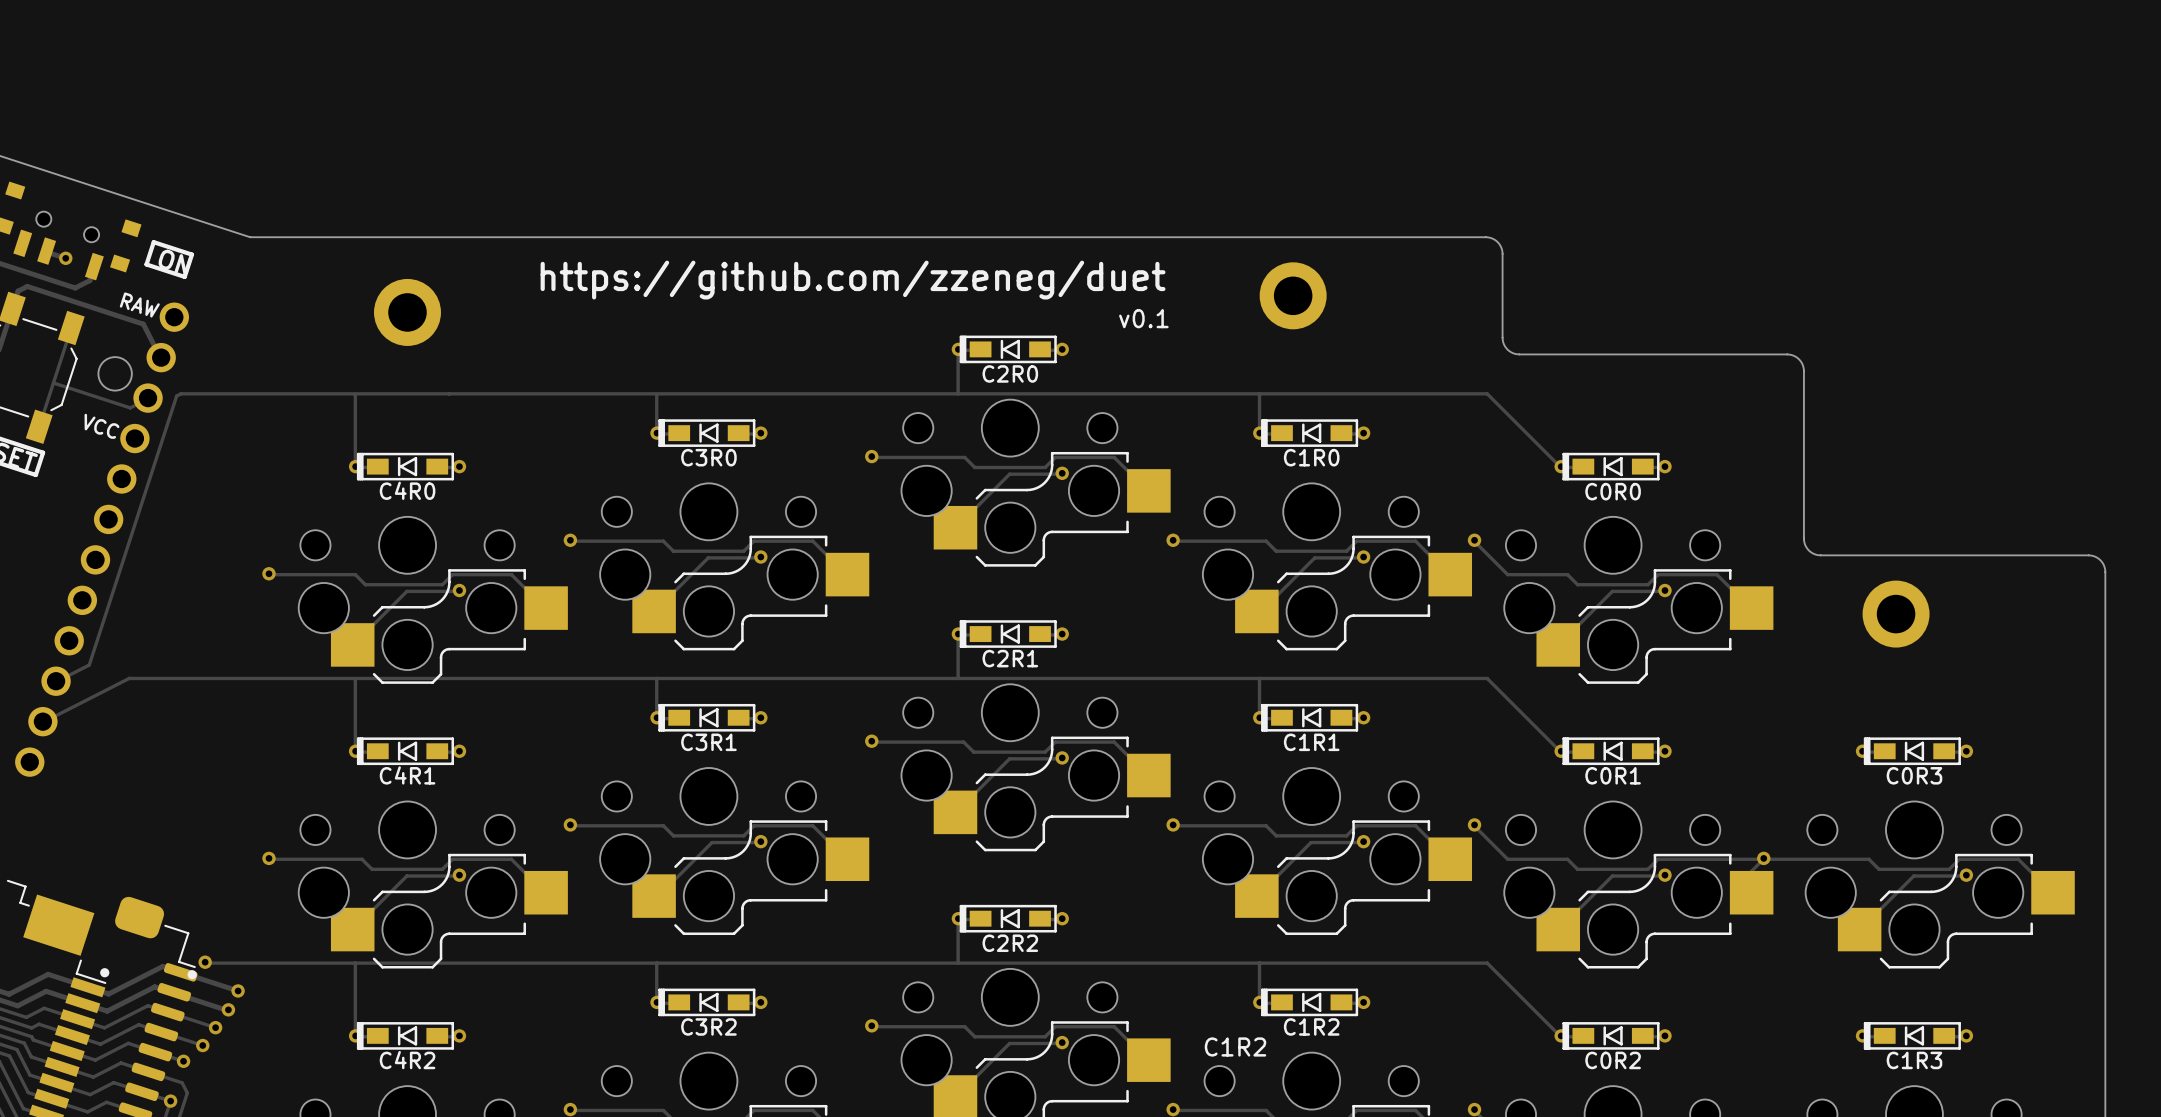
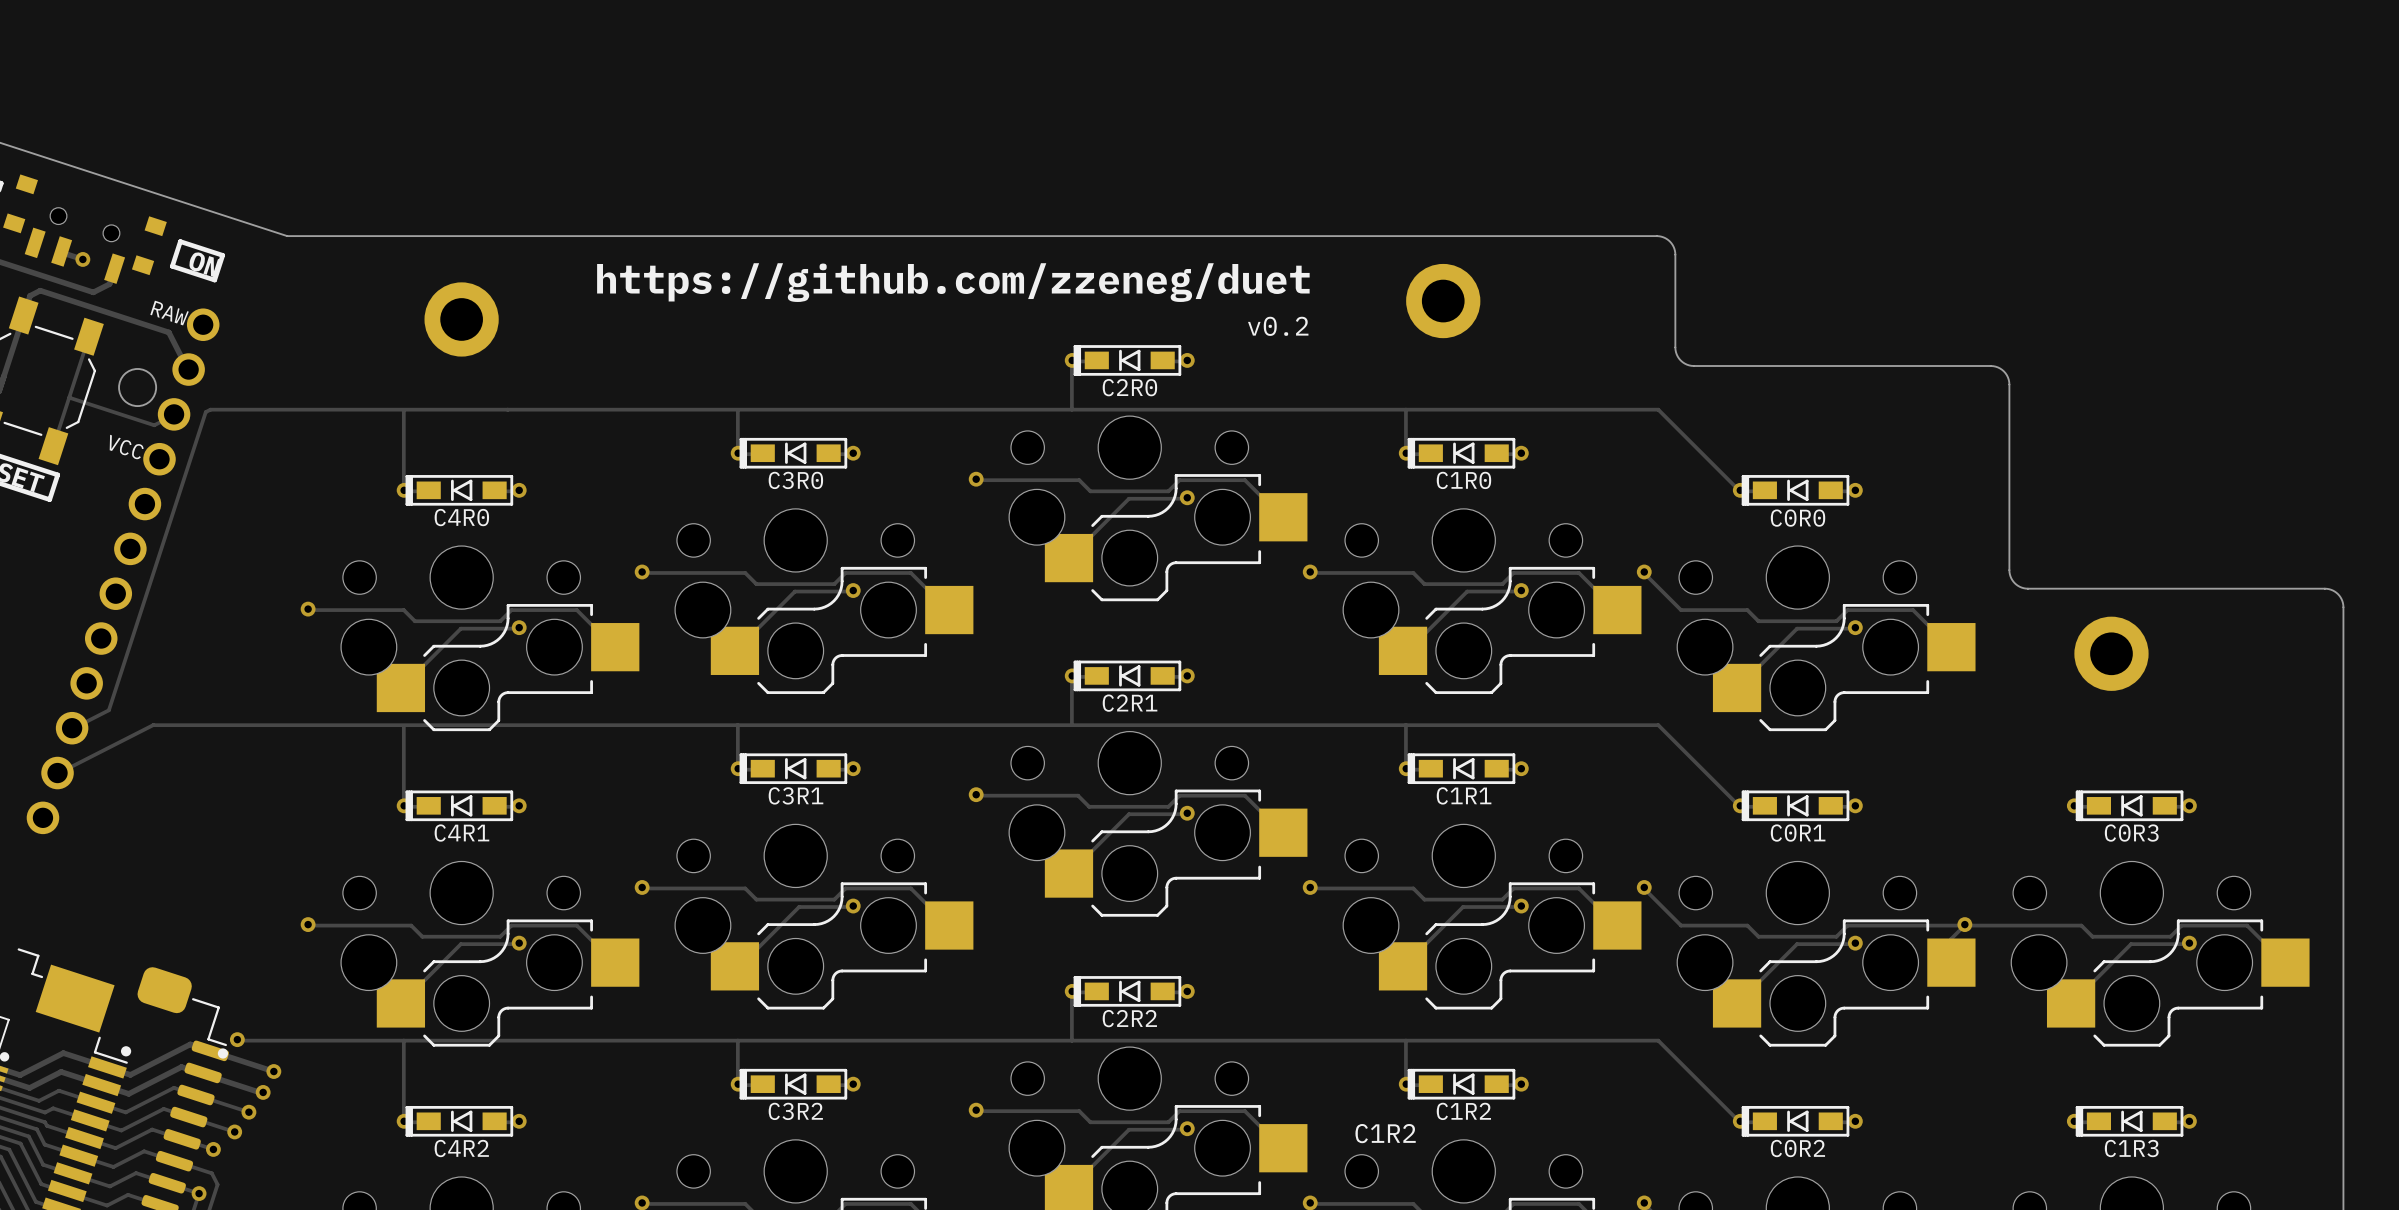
text: v0.1 (1143, 318) -> v0.2 (1278, 326)

